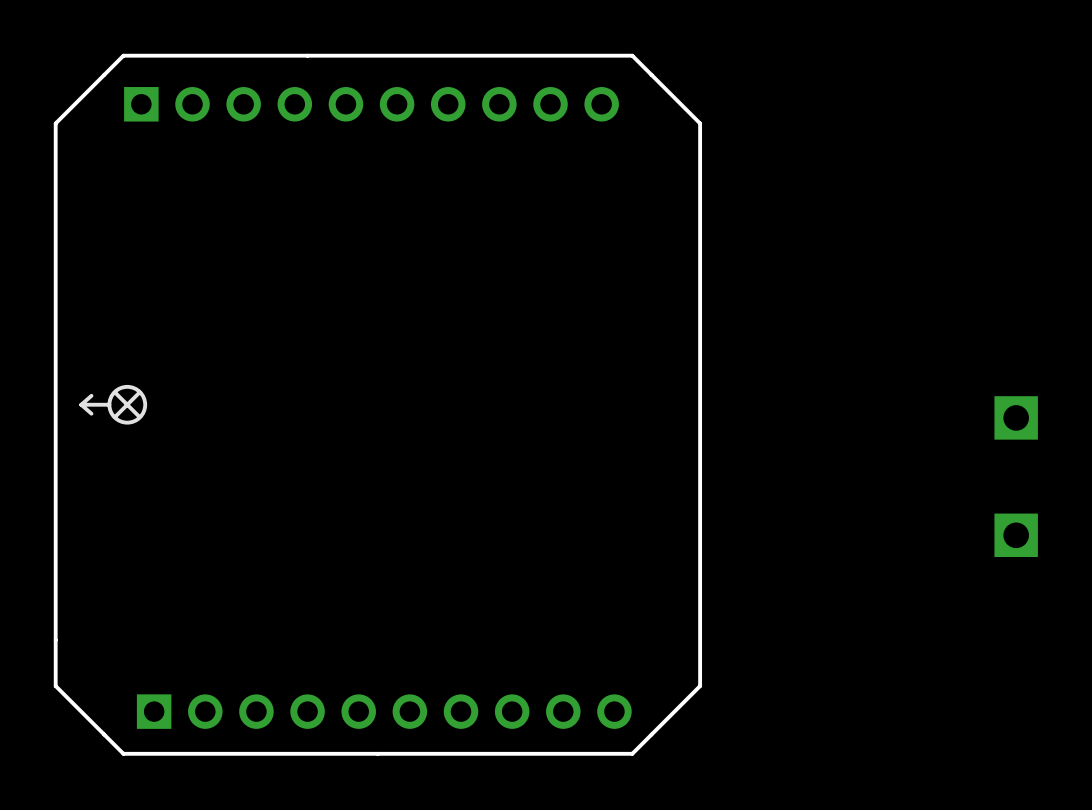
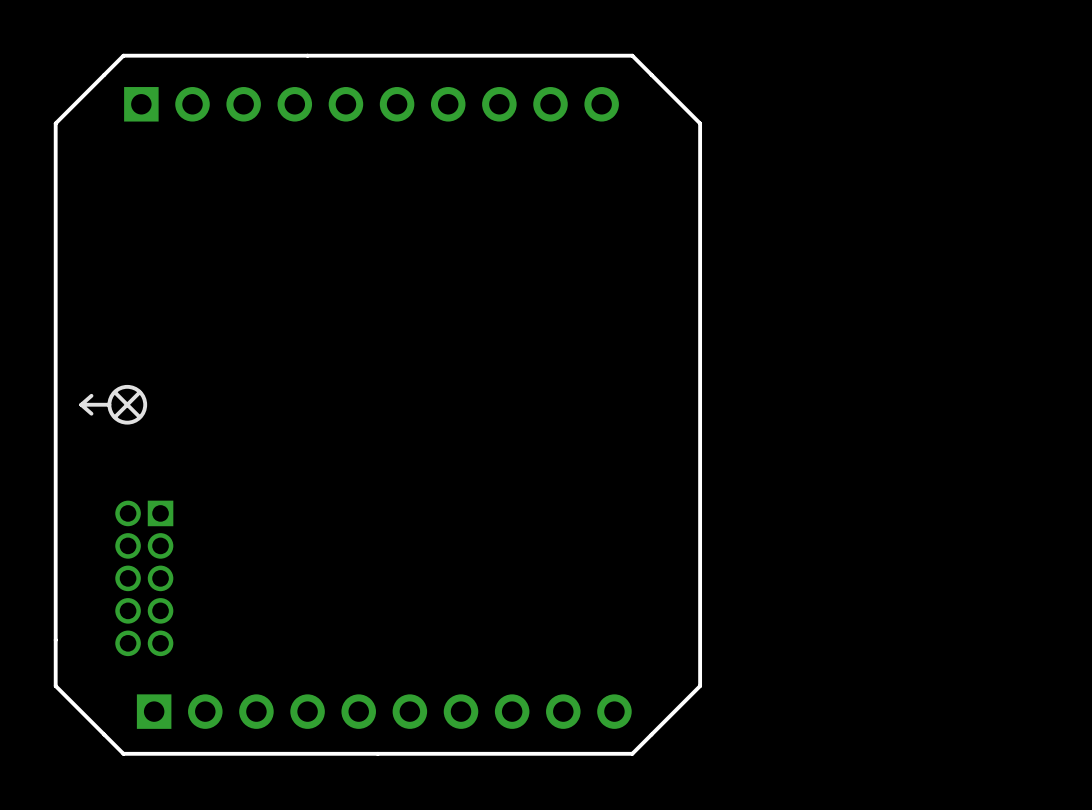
part: (1016, 417) -> none
part: (1016, 535) -> none
part: none -> (144, 578)

